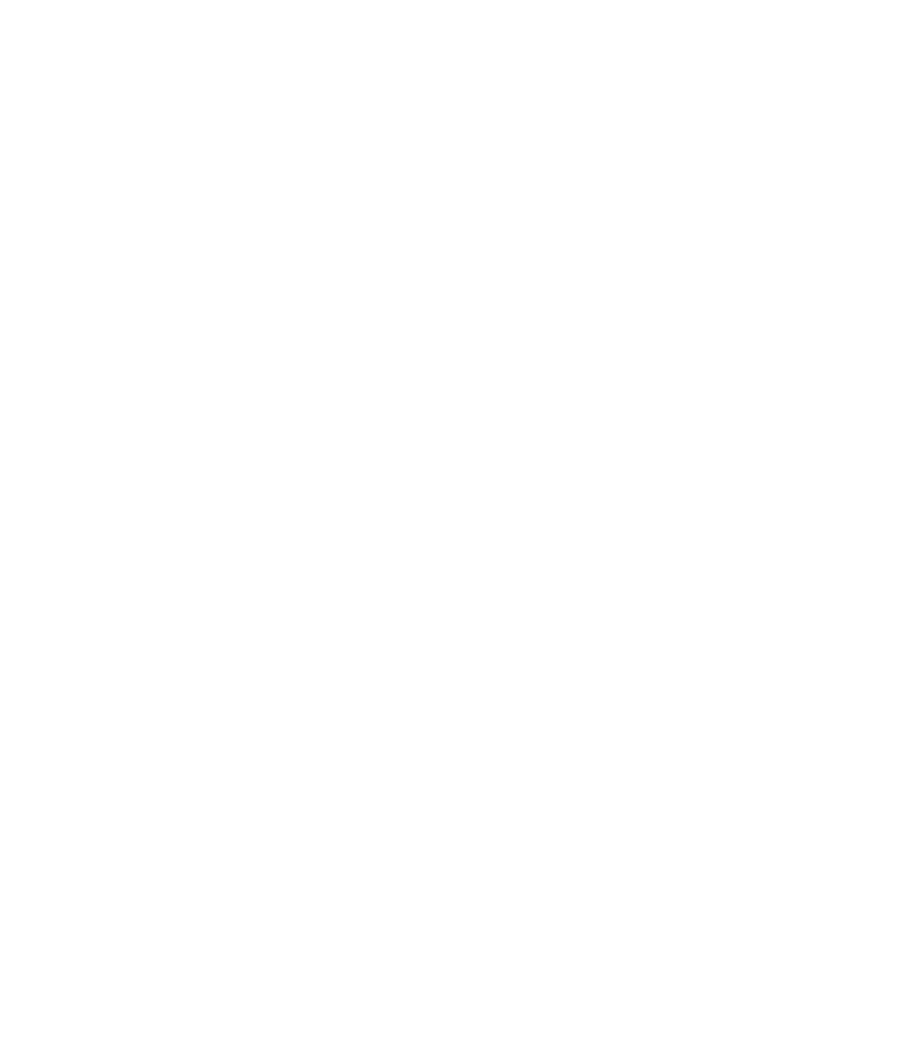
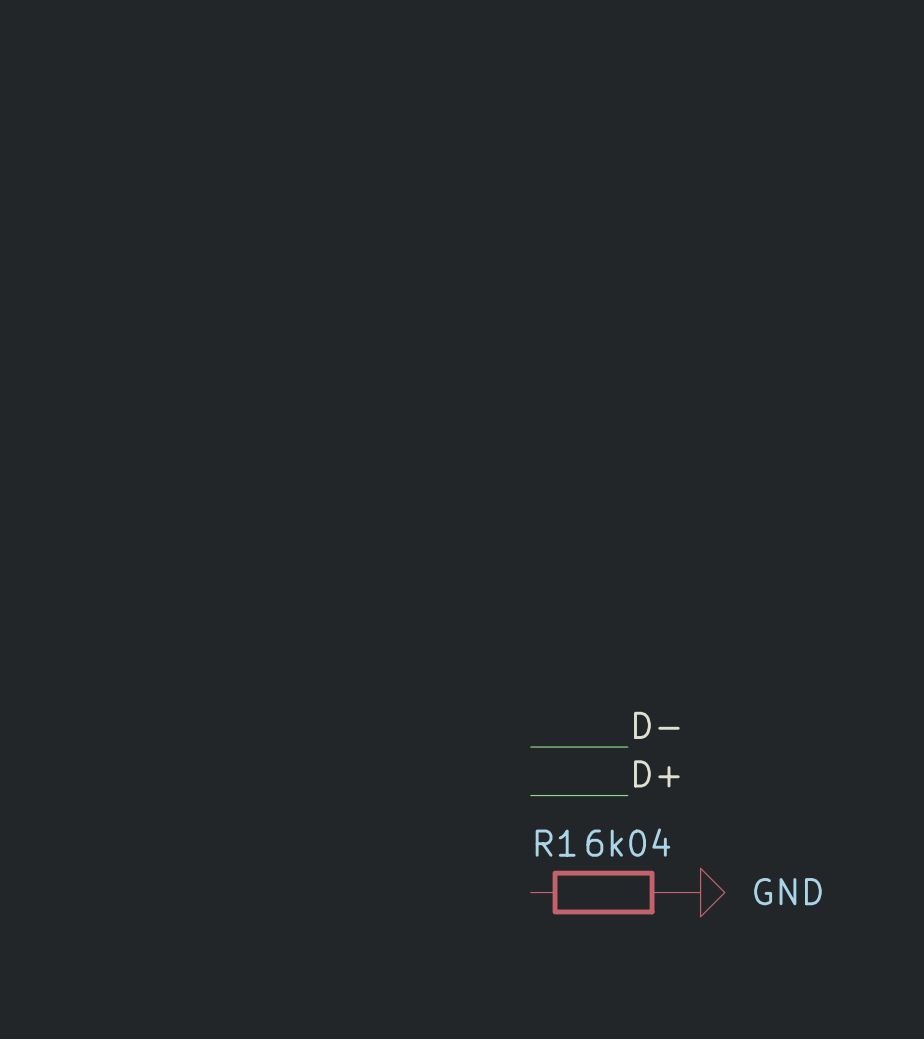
label: none -> D- (656, 725)
wire: none -> (530, 747) (627, 747)
label: none -> D+ (656, 773)
wire: none -> (530, 795) (627, 795)
R1: none -> 6k04 (603, 892)
power symbol: none -> GND (700, 892)

